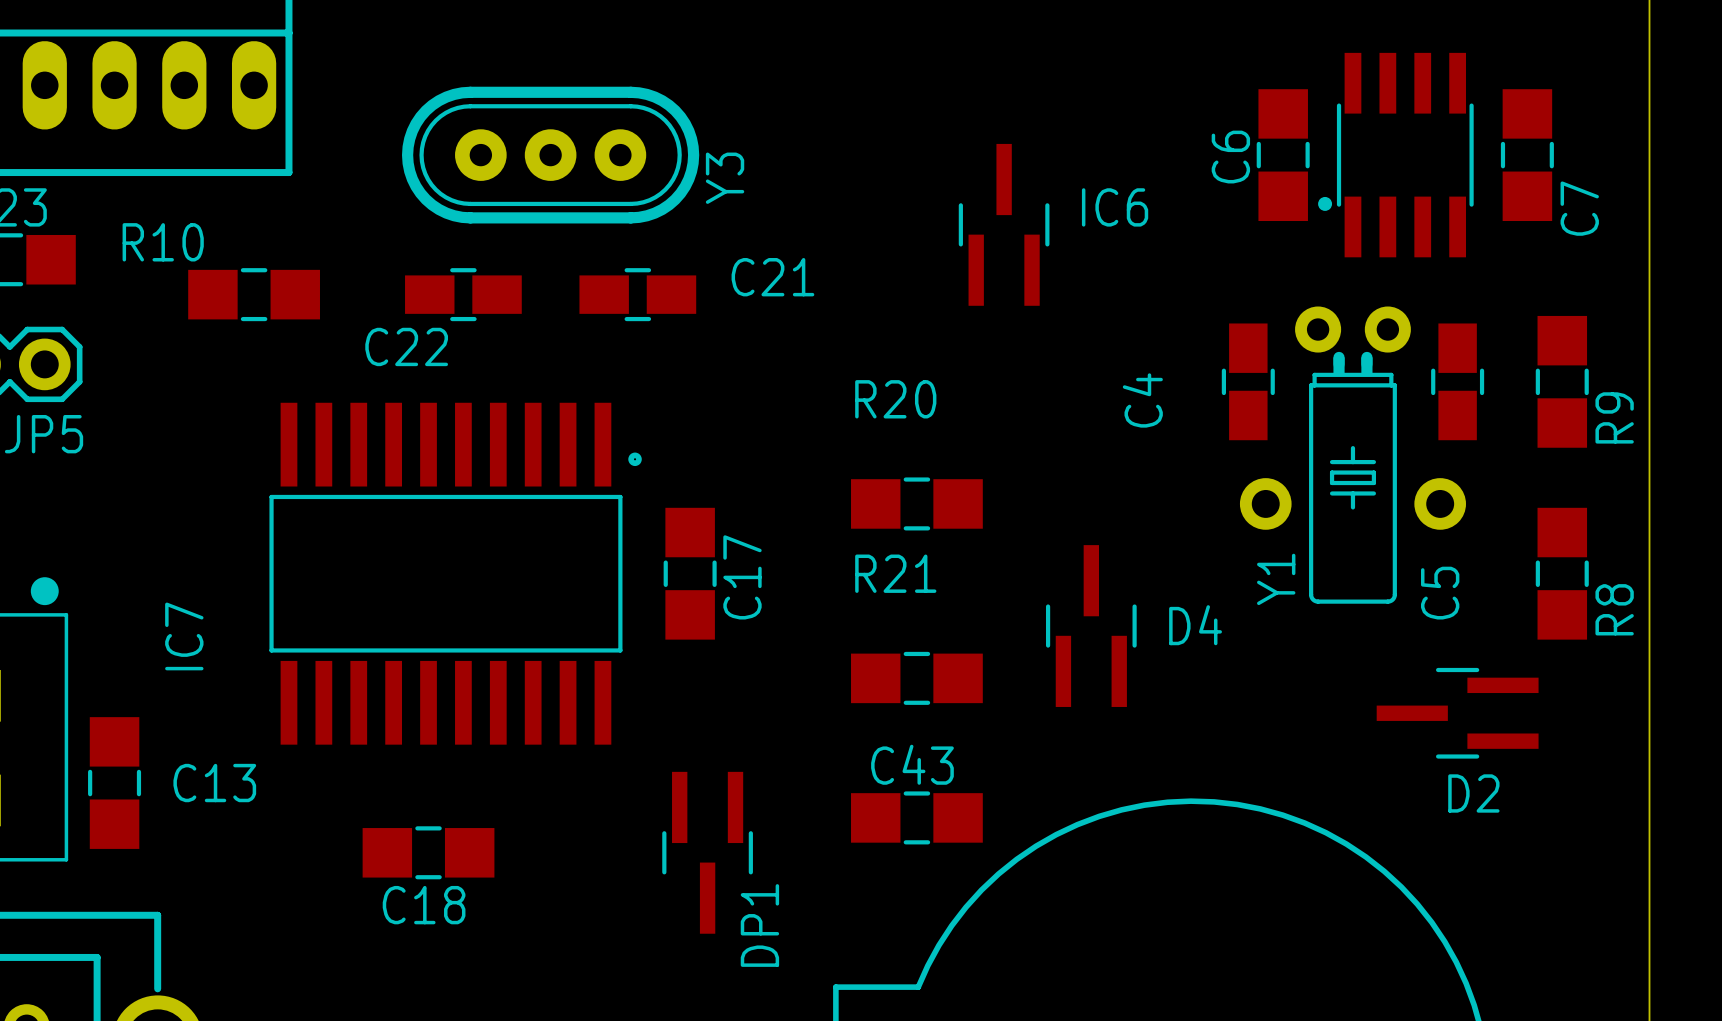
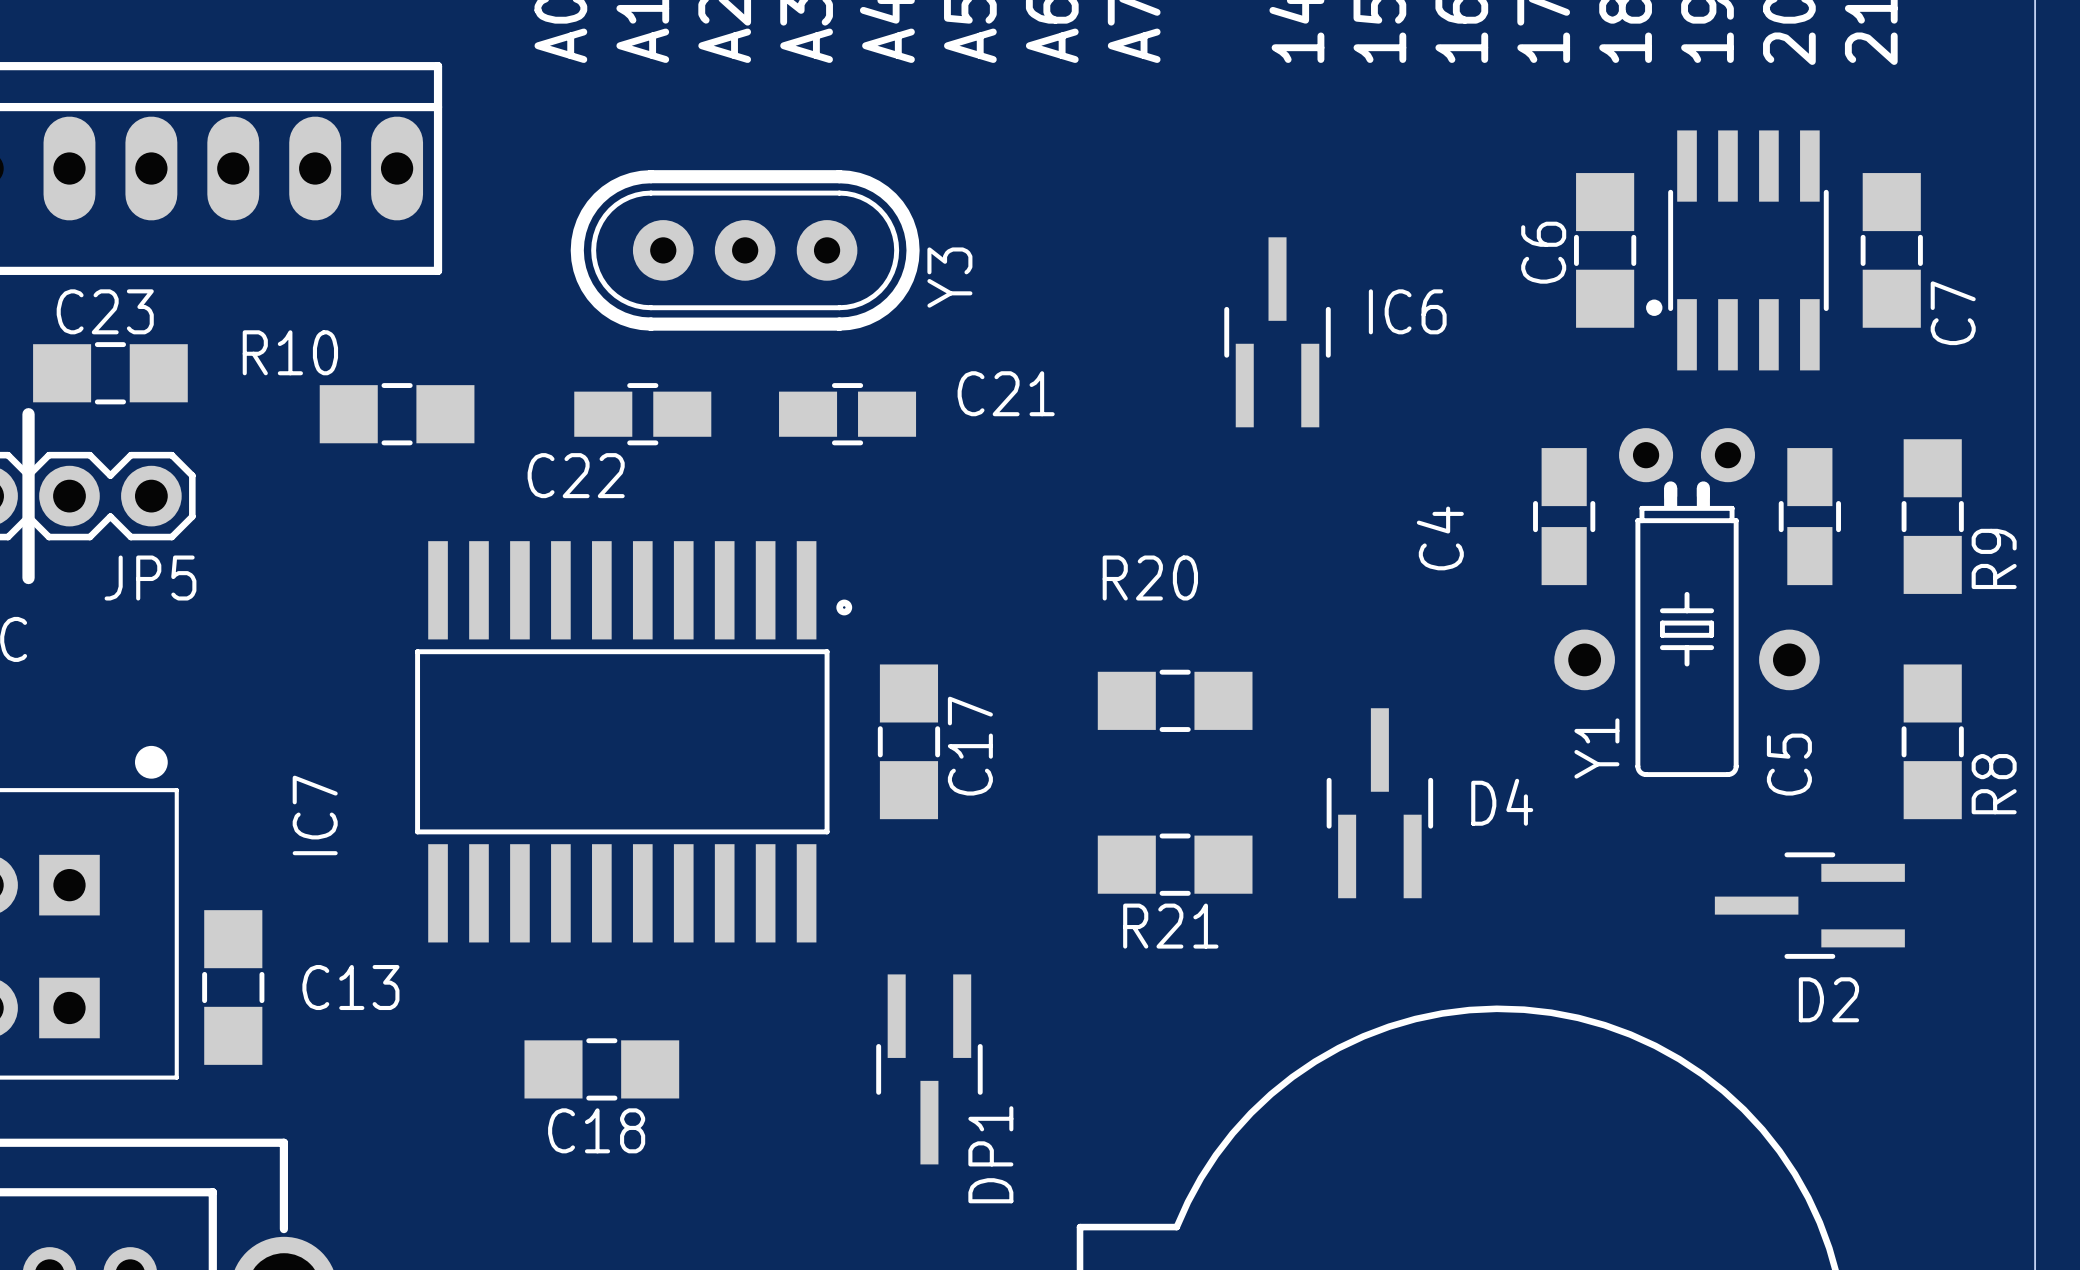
R20 position: (916, 503) -> (1175, 700)
R21 name position: R21 (895, 573) -> R21 (1170, 926)
C43: (916, 817) -> none

